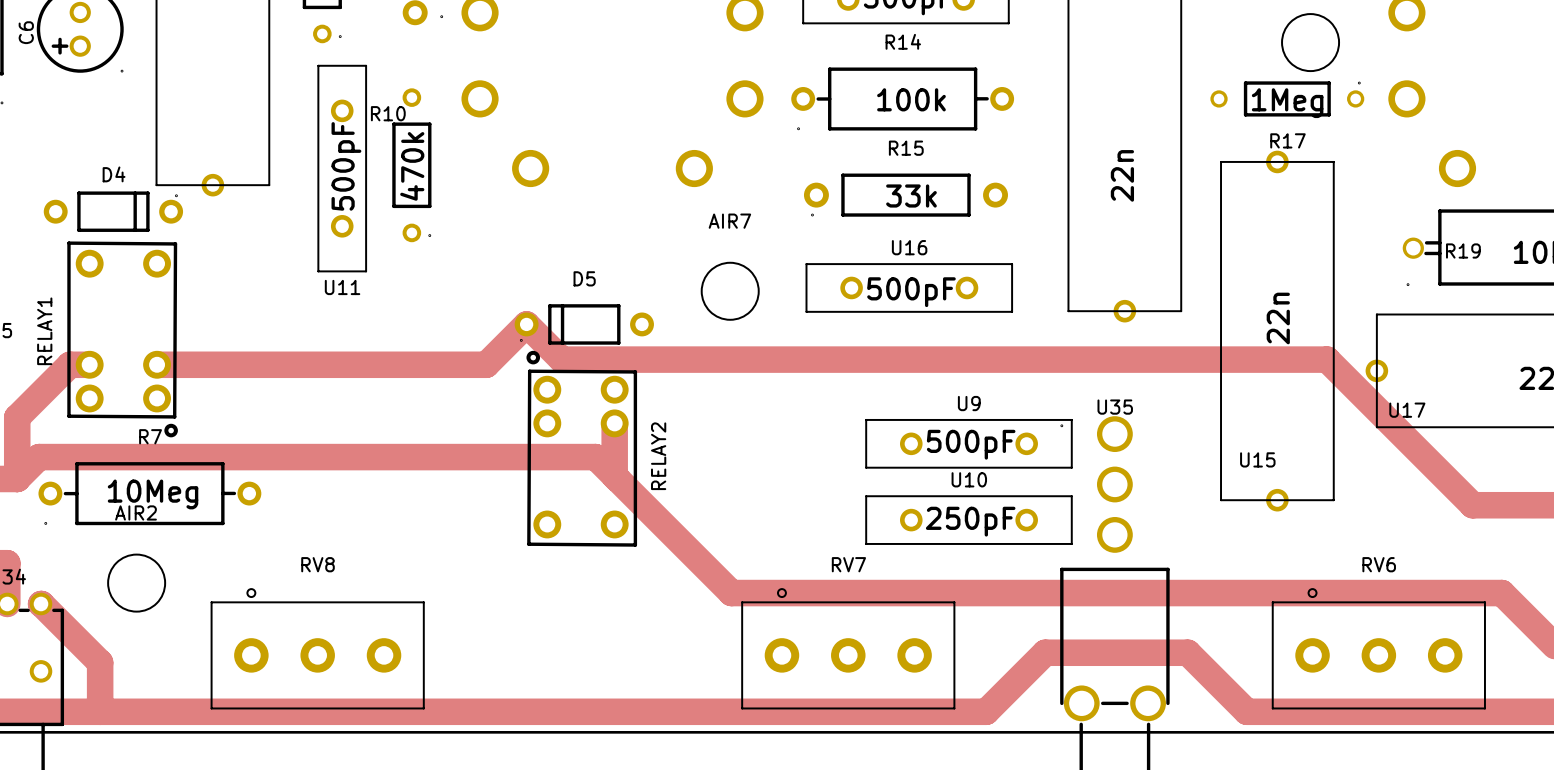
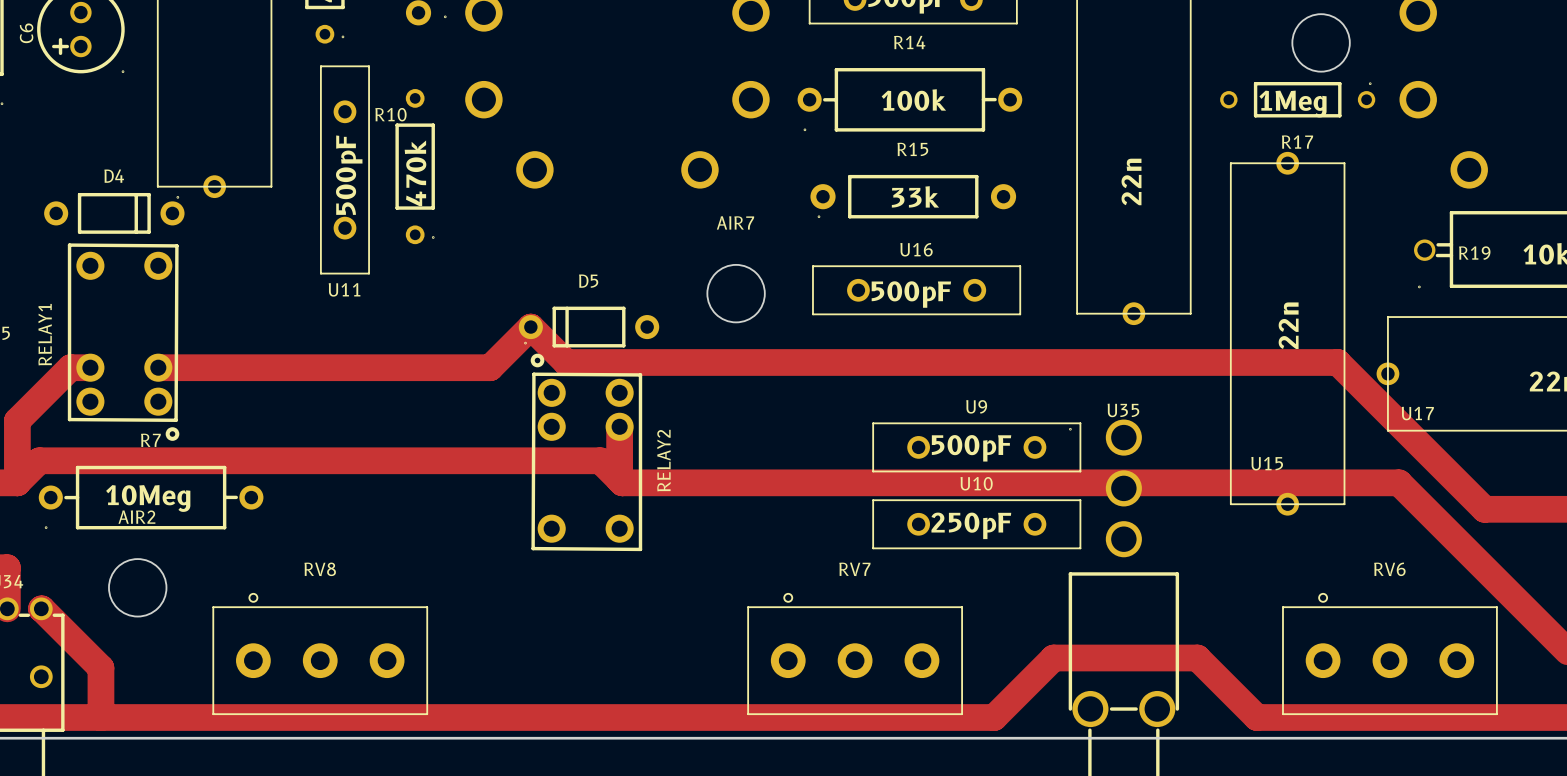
track: (617, 478) (731, 593) (1501, 593) -> (622, 482) (1399, 482) (1514, 597)

